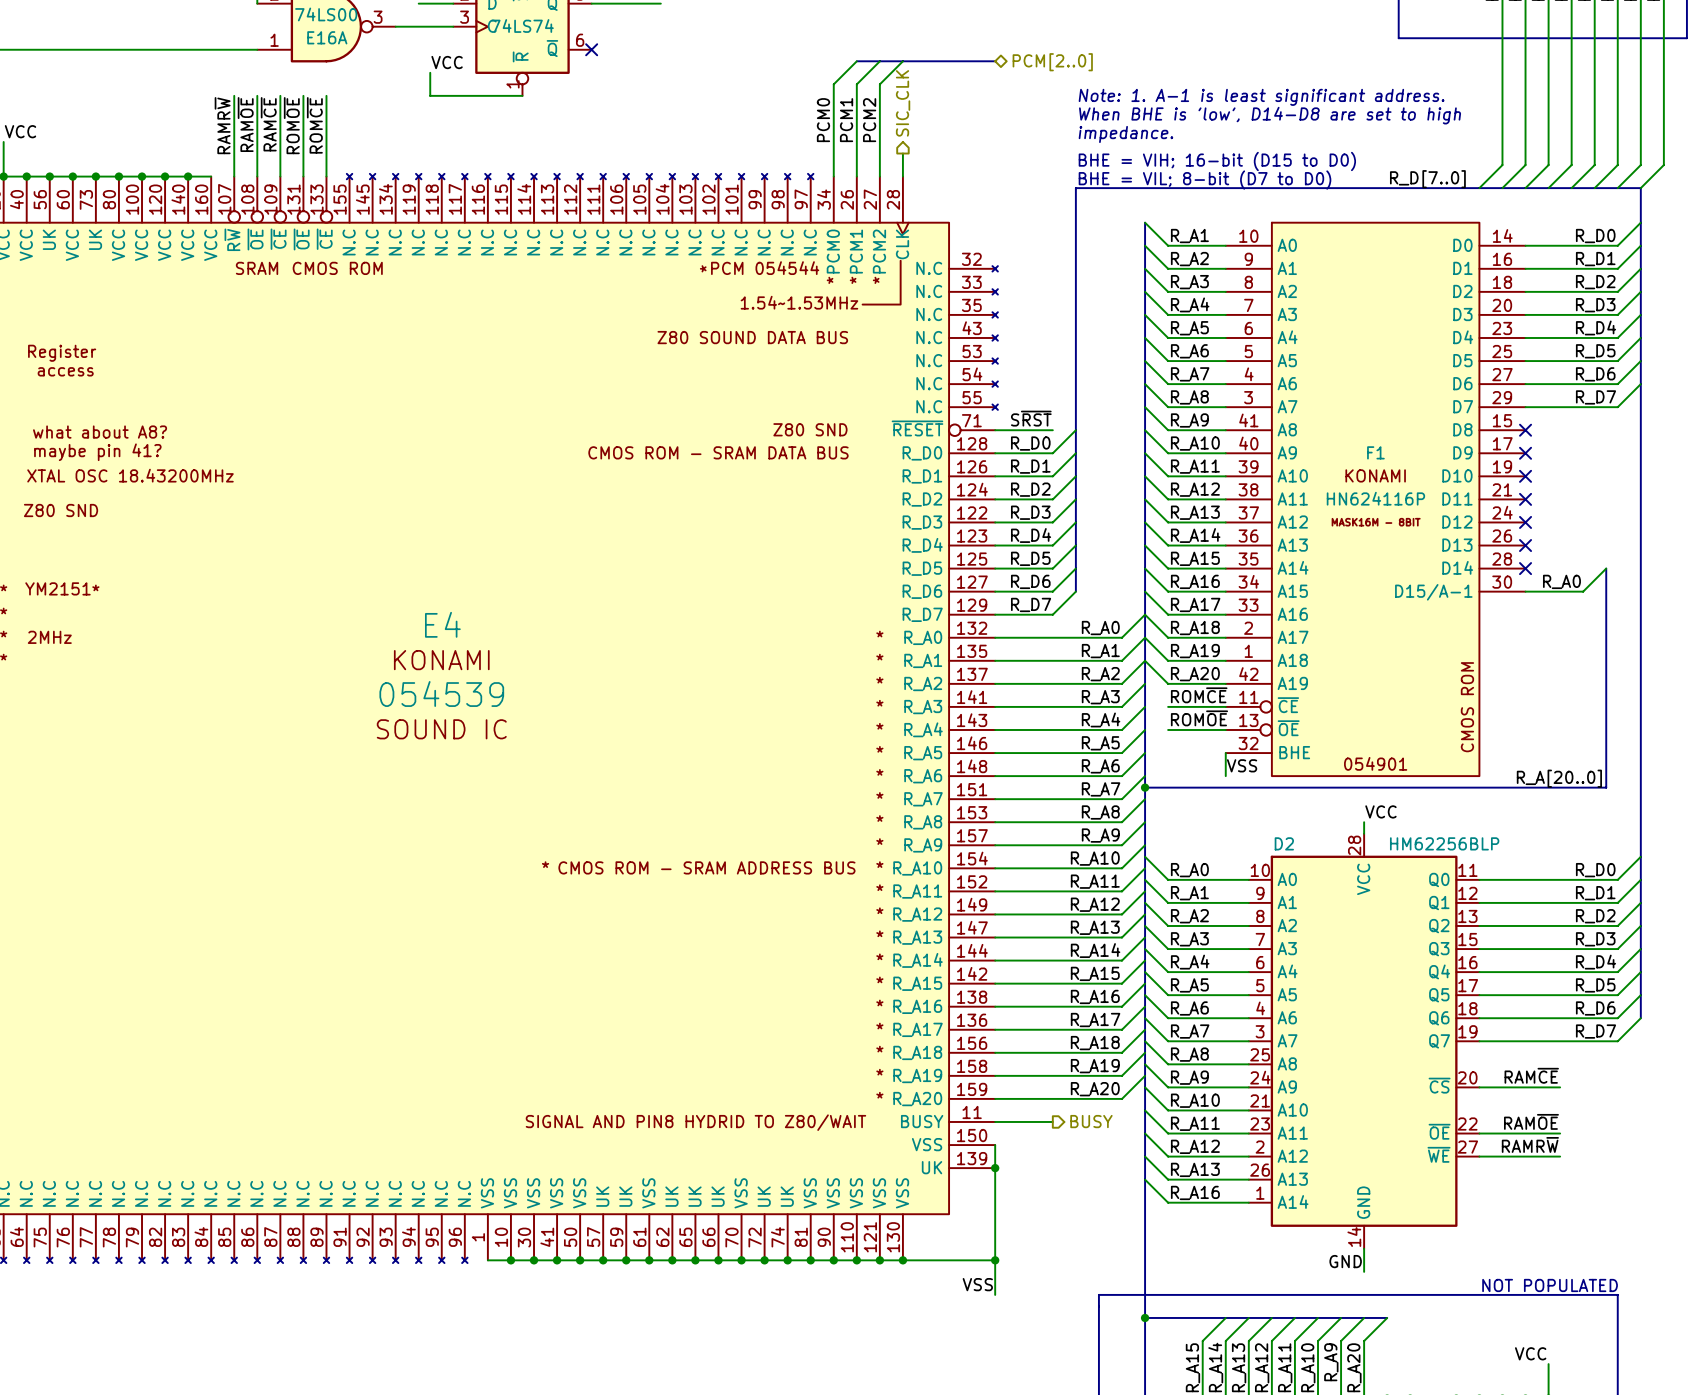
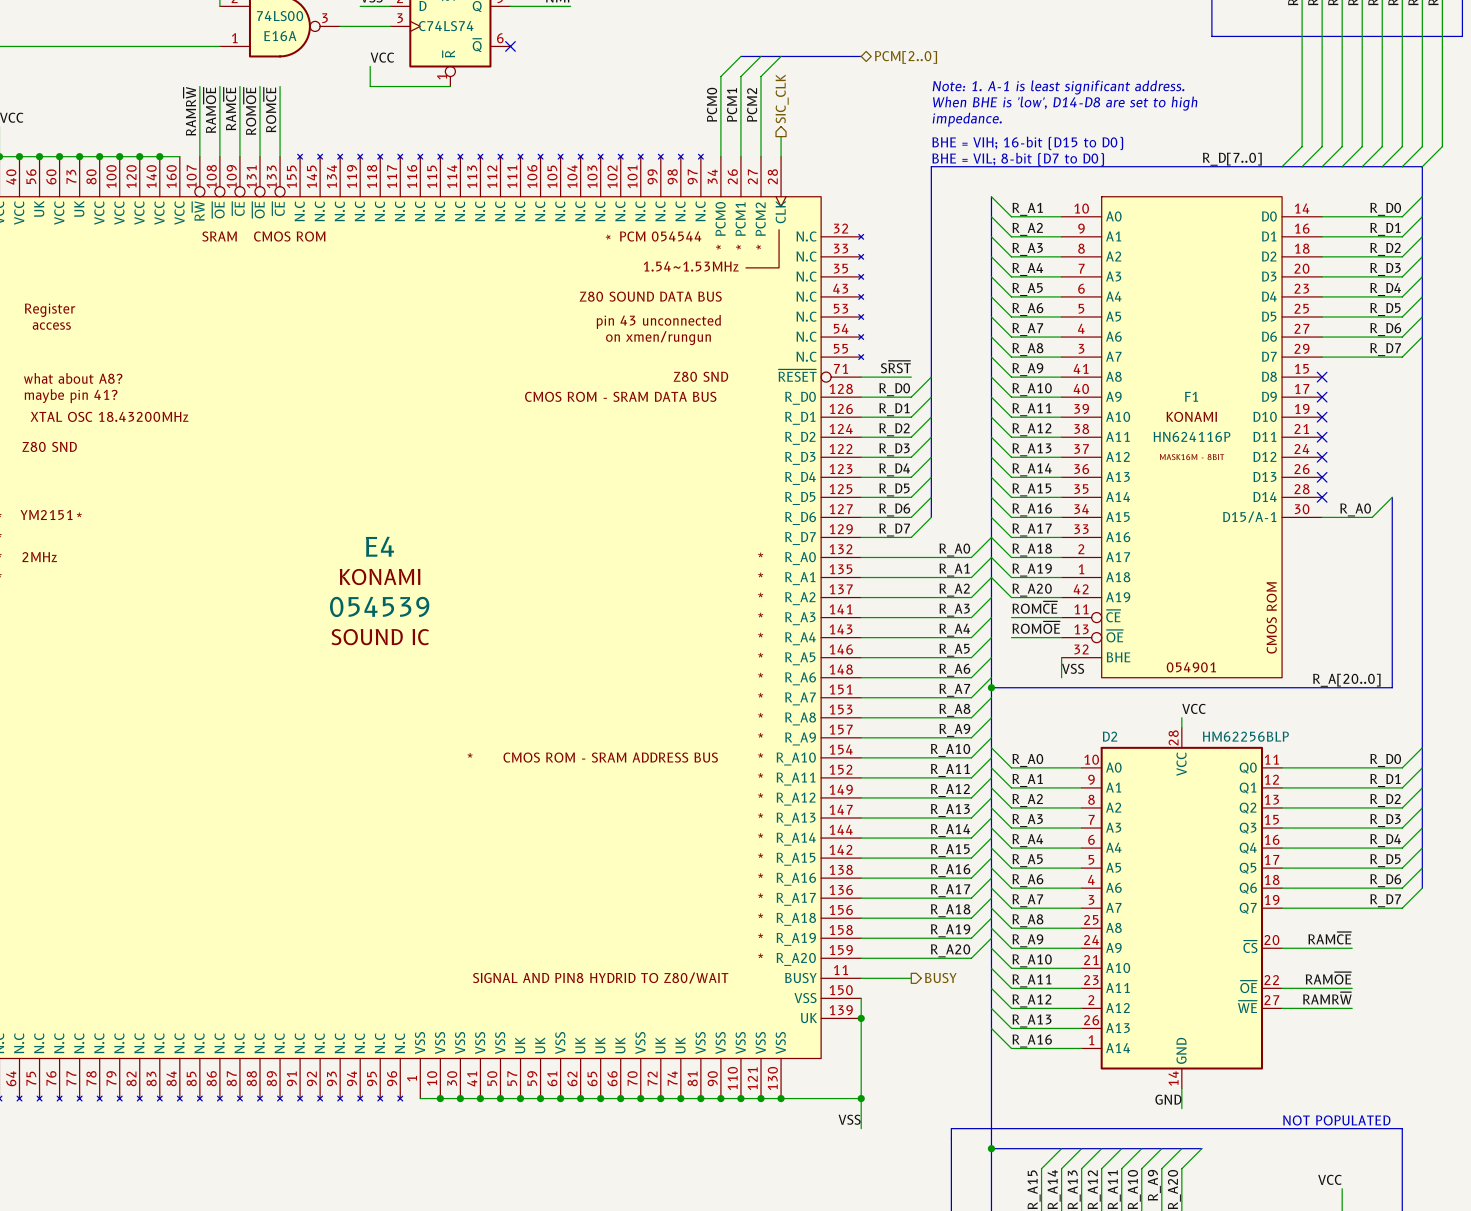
E4 text: none -> pin 43 unconnected (658, 321)
E4 text: none -> on xmen/rungun (658, 338)

